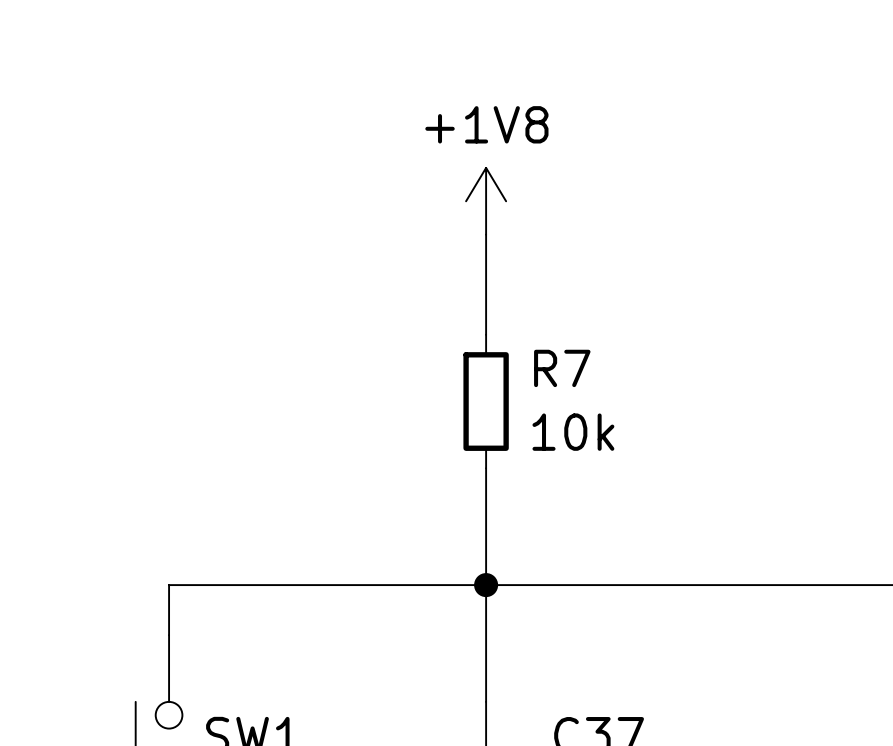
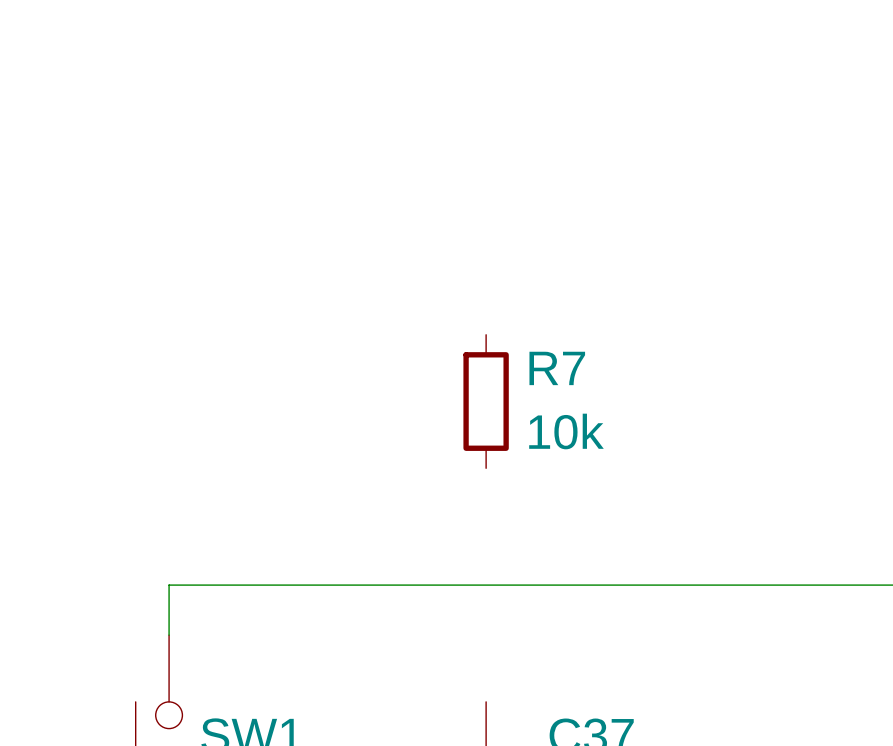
power symbol: +1V8 (486, 201) -> none
wire: (486, 234) (486, 334) -> none
wire: (486, 468) (486, 701) -> none
junction: (486, 585) -> none

